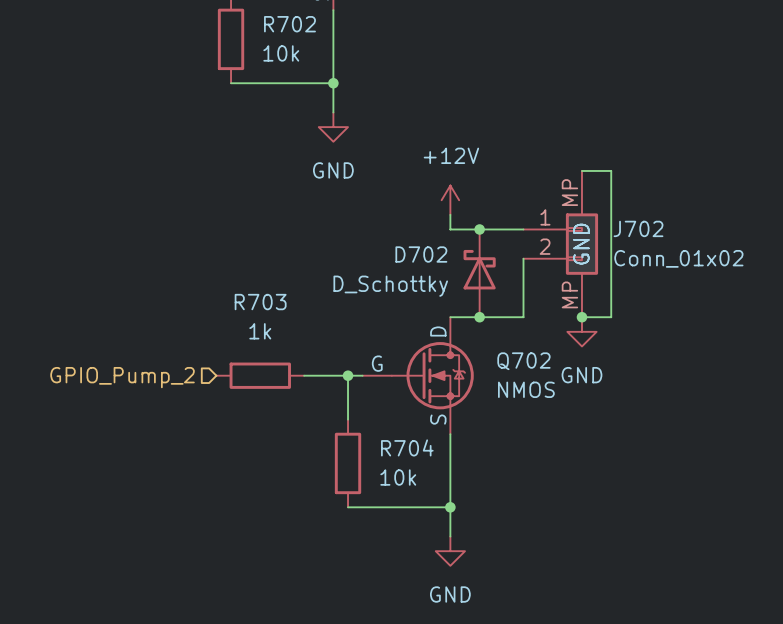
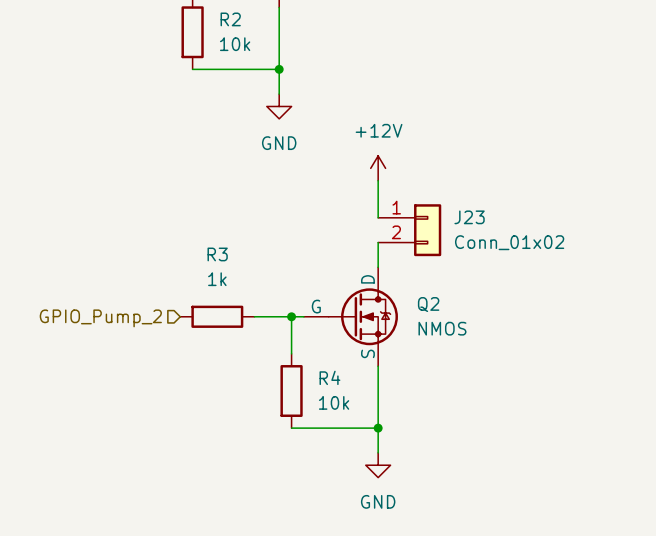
R702 name: R702 (289, 24) -> R2 (230, 19)
wire: (581, 170) (611, 170) (611, 317) (581, 317) -> none
wire: (450, 229) (523, 229) -> (378, 193) (378, 217)
junction: (479, 229) -> none
J702: Conn_01x02 (560, 244) -> none
wire: (523, 258) (523, 317) (450, 317) -> (378, 242) (378, 267)
D702: D_Schottky (479, 273) -> none
J23: none -> Conn_01x02 (409, 230)
R703 name: R703 (260, 302) -> R3 (217, 254)
junction: (479, 317) -> none
junction: (581, 317) -> none
power symbol: GND (581, 331) -> none
Q702 name: Q702 (523, 361) -> Q2 (428, 304)
R704 name: R704 (407, 447) -> R4 (329, 377)

